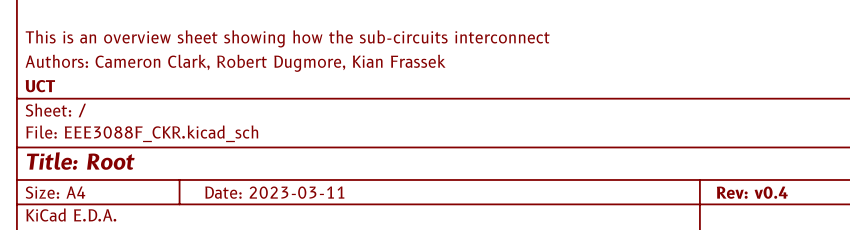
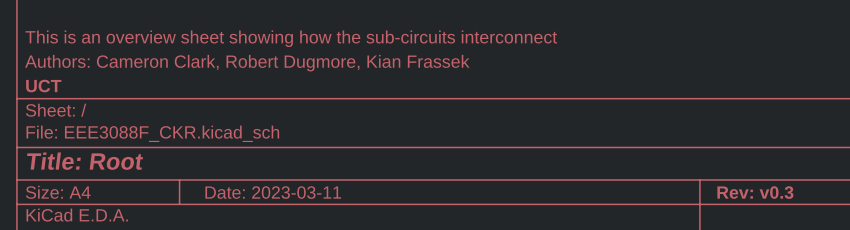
title block: Rev: v0.4 (752, 192) -> Rev: v0.3 (755, 192)

